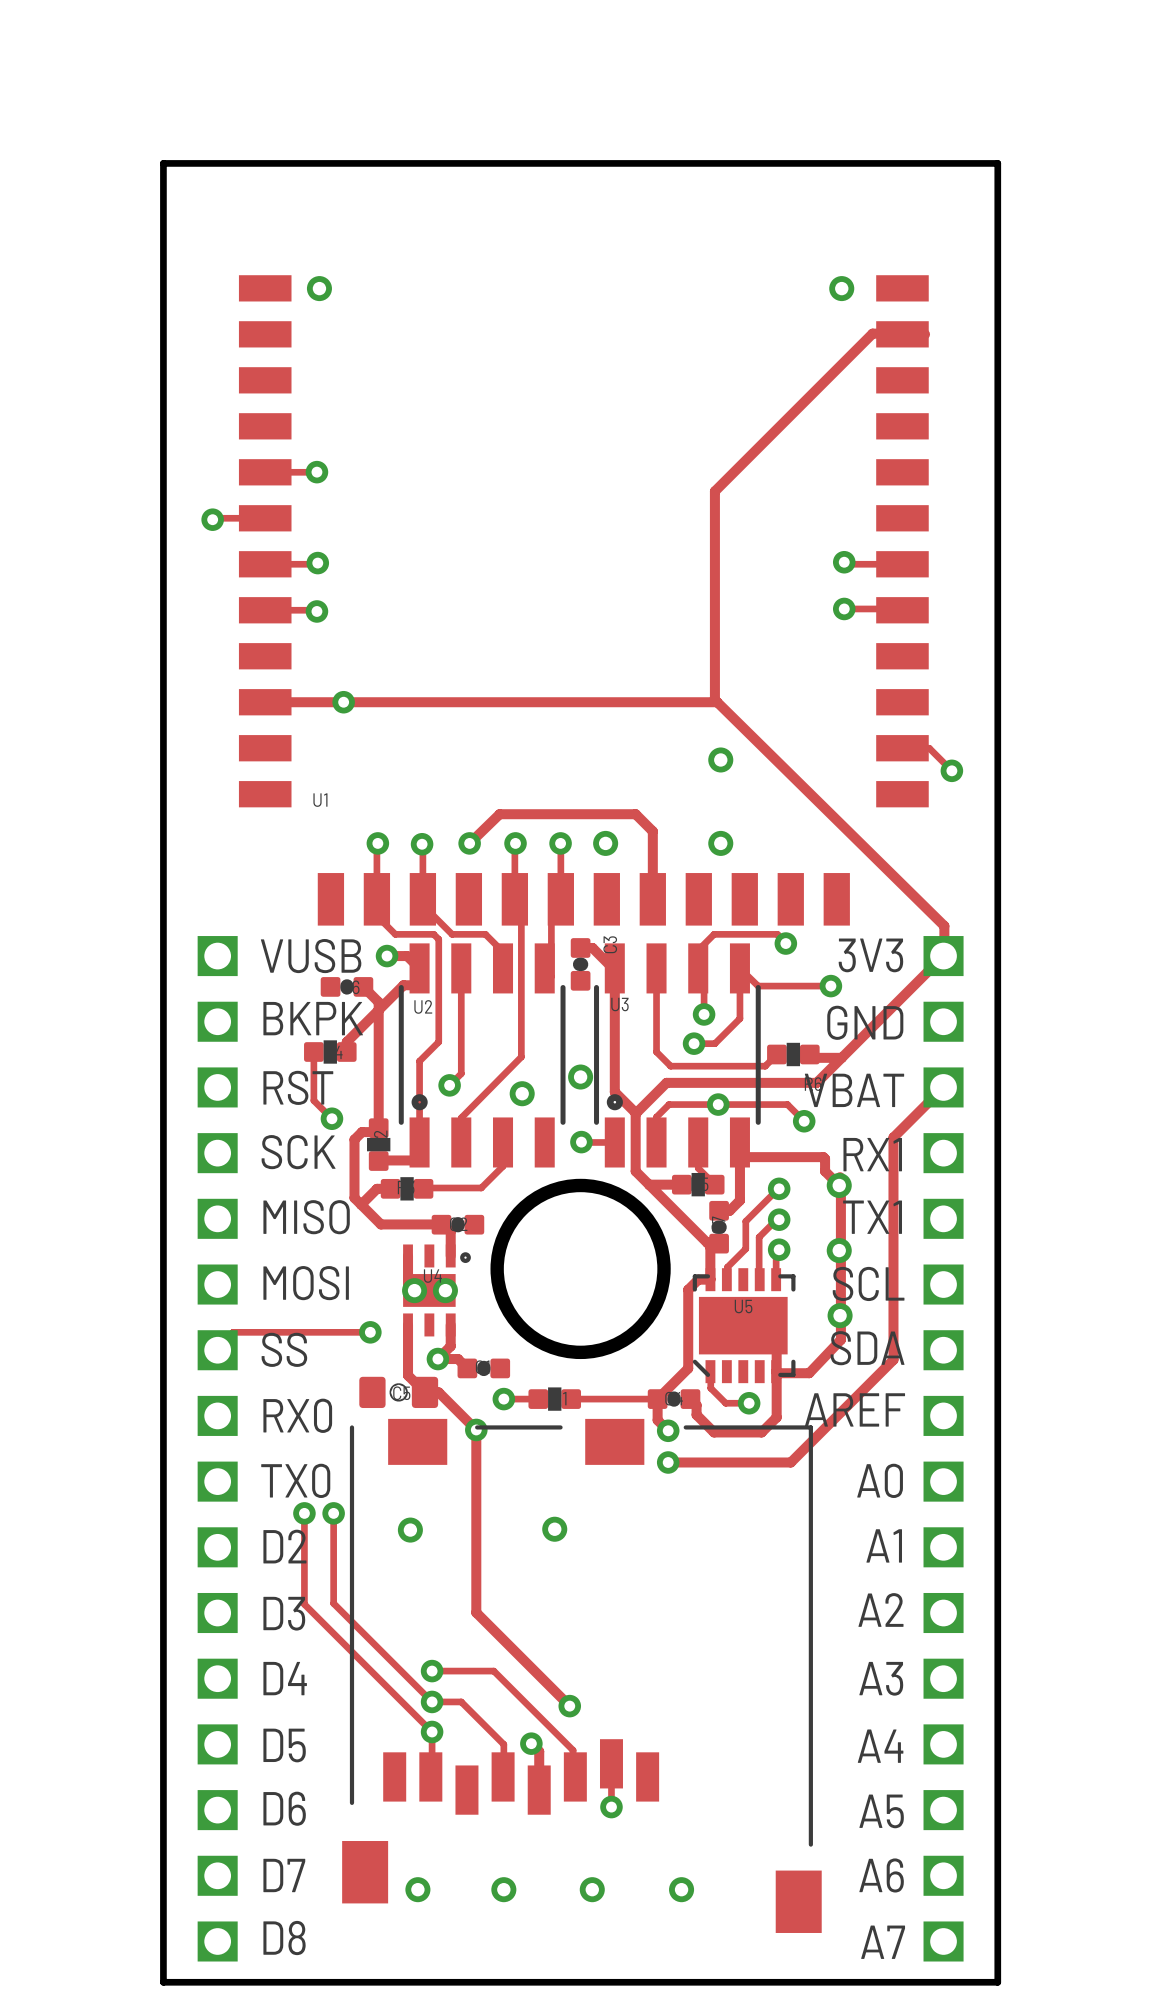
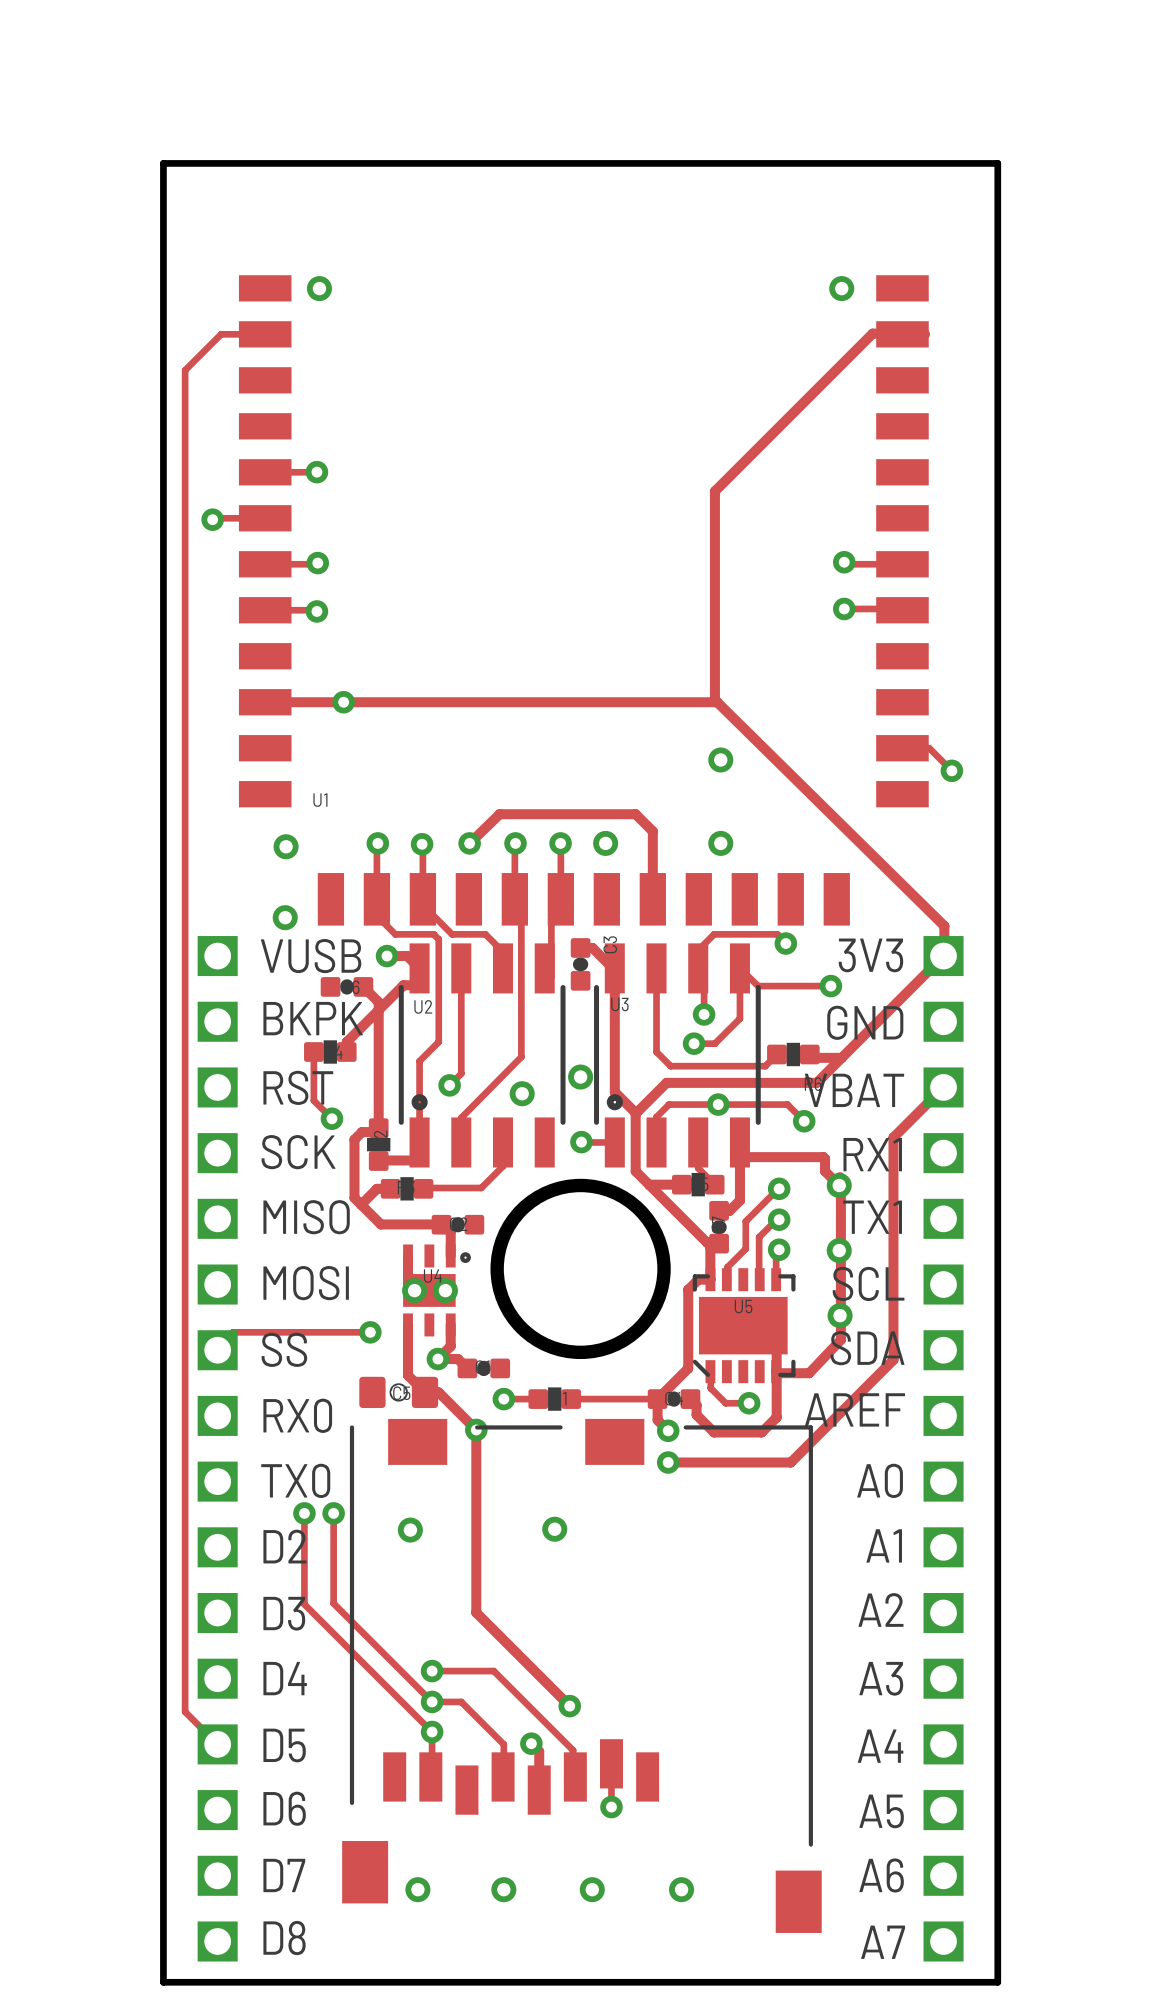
track: none -> (265, 334) (221, 334) (185, 370) (185, 1711) (217, 1744)
via: none -> (286, 846)
via: none -> (285, 917)

